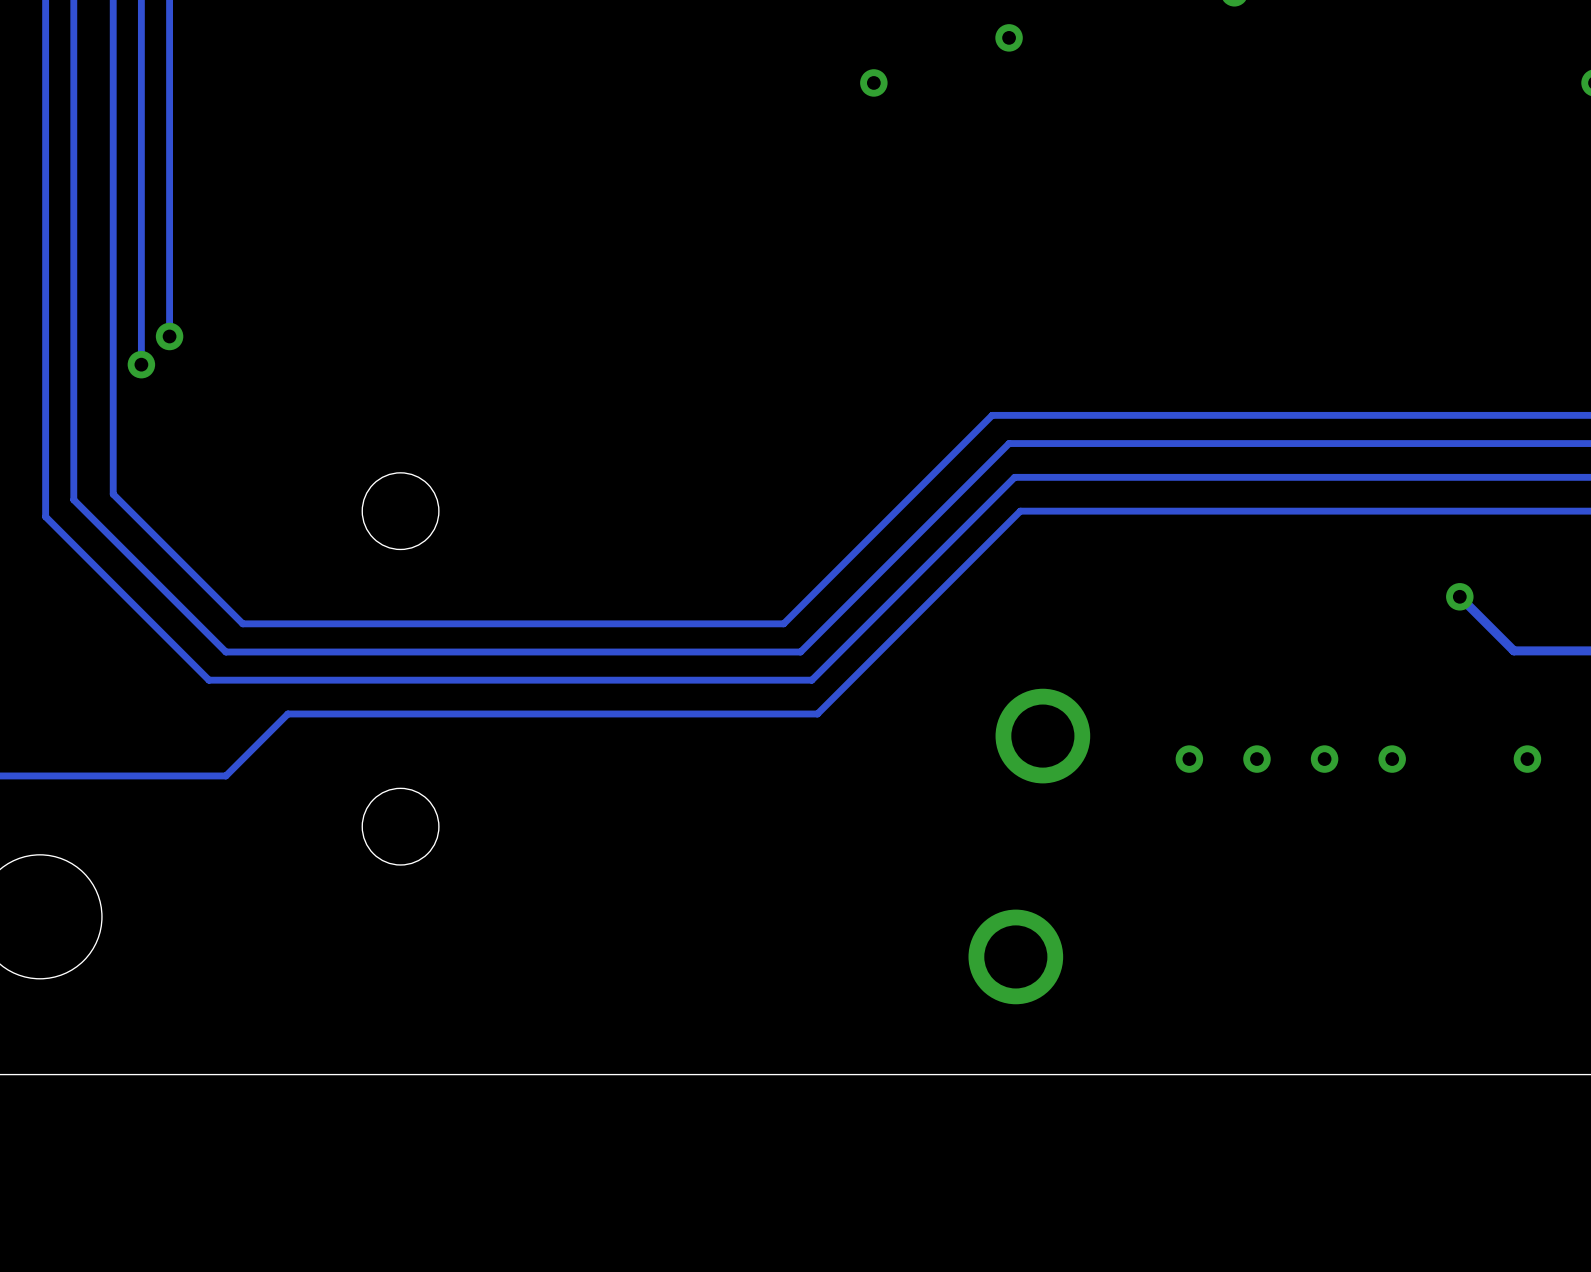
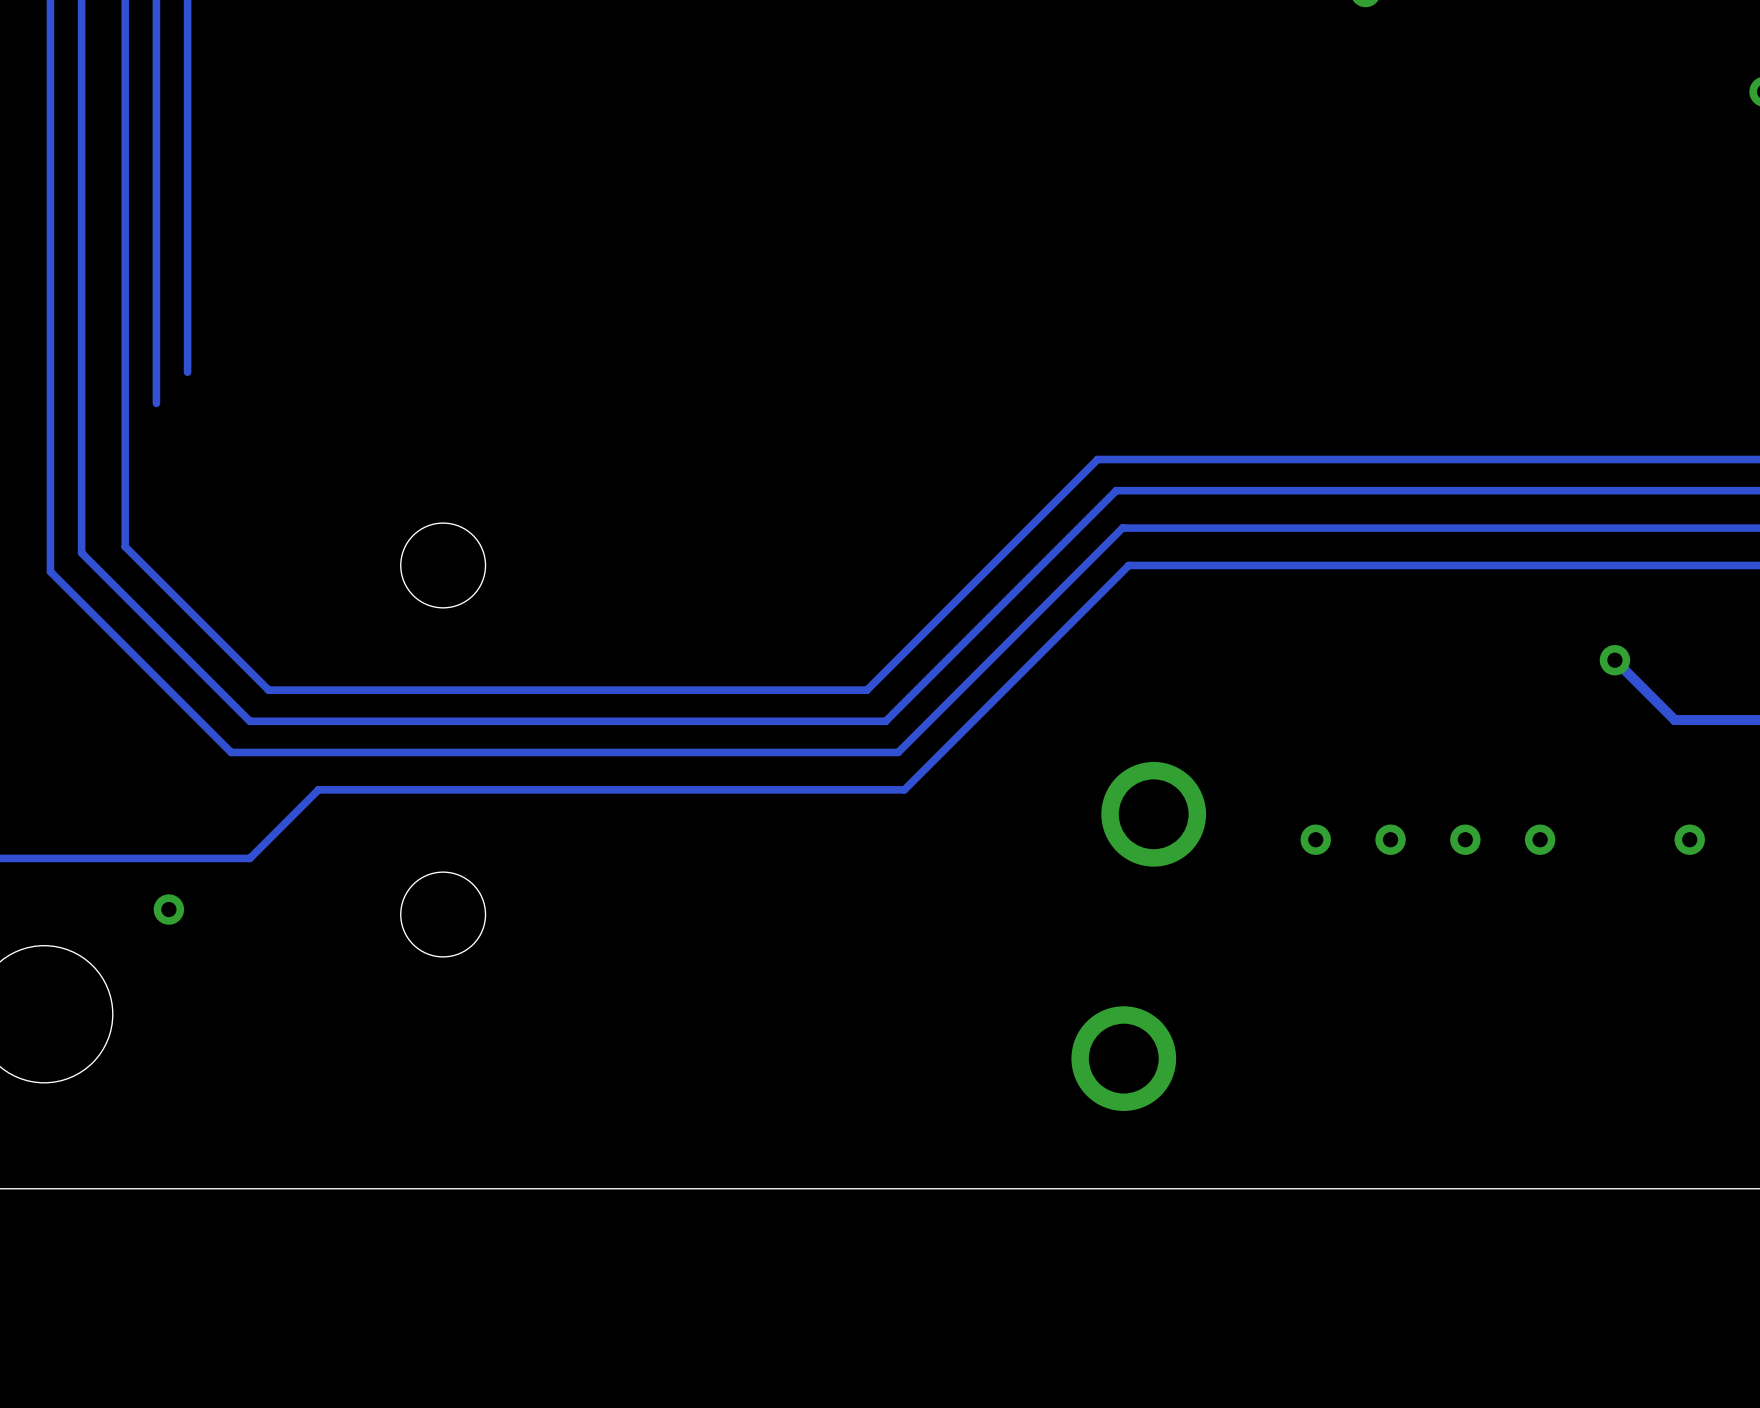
via: (1009, 37) -> none
via: (873, 82) -> none
via: (169, 336) -> none
via: (141, 364) -> none
via: none -> (168, 909)

